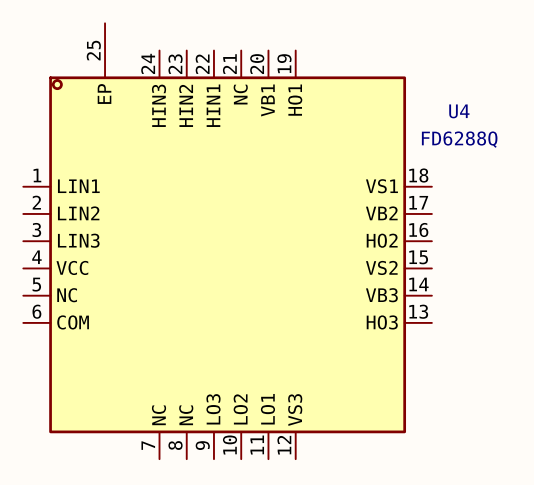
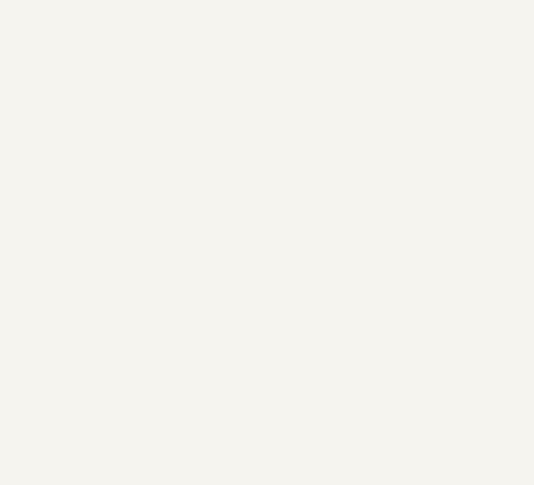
U4: FD6288Q (227, 241) -> none

